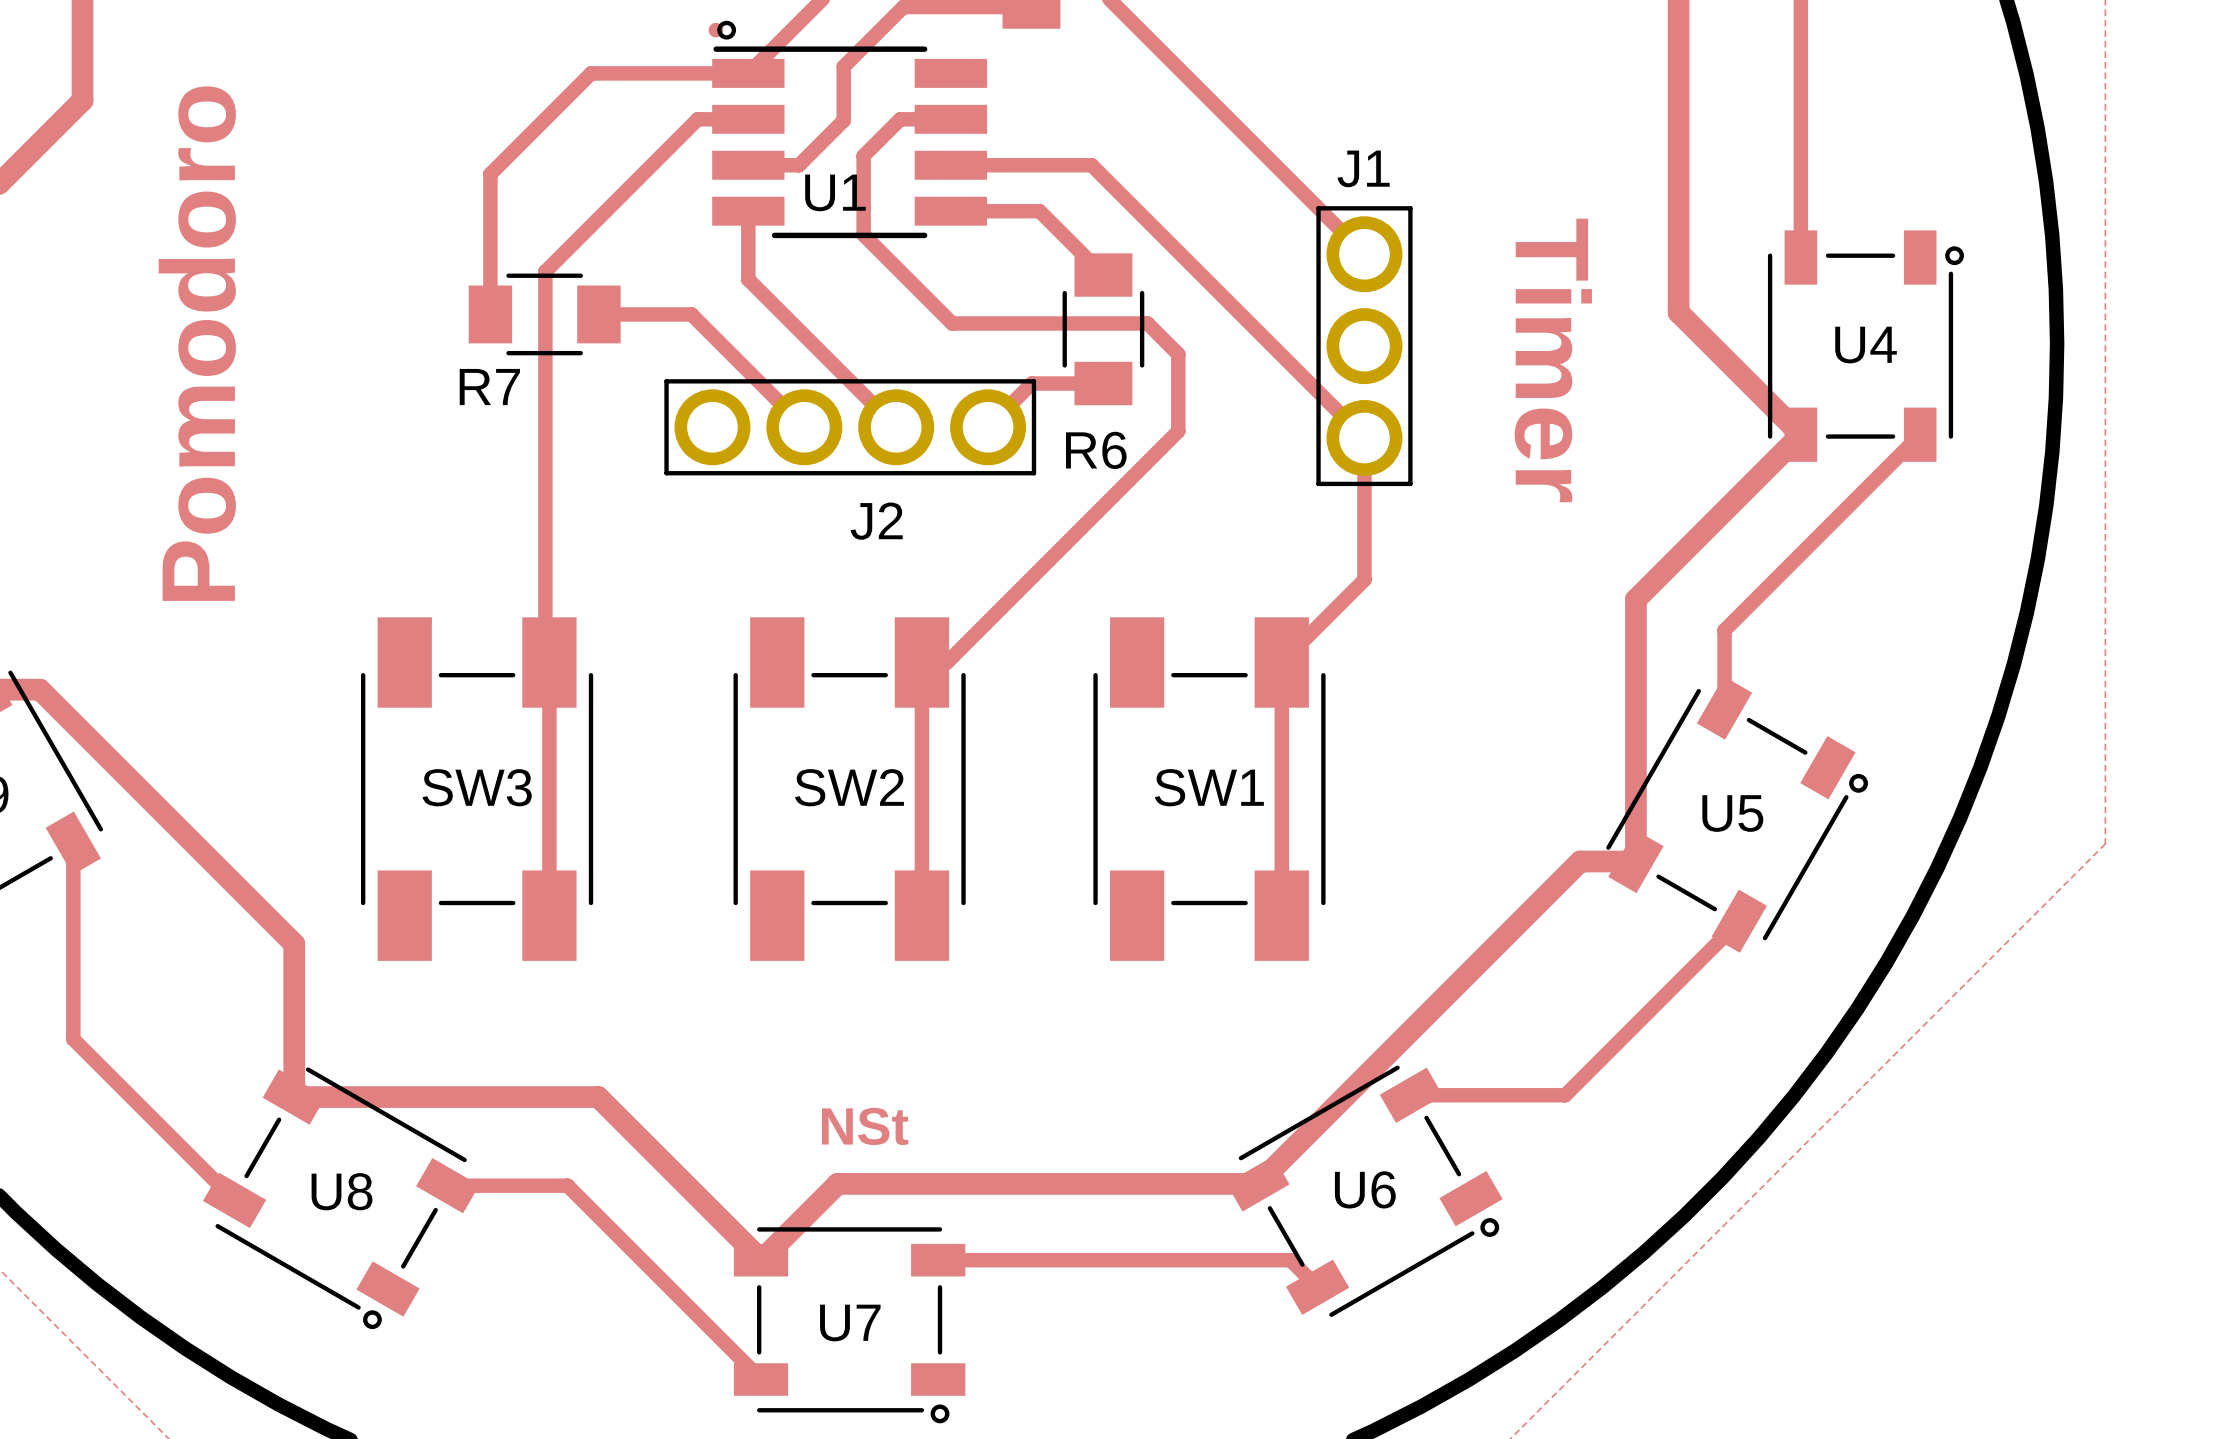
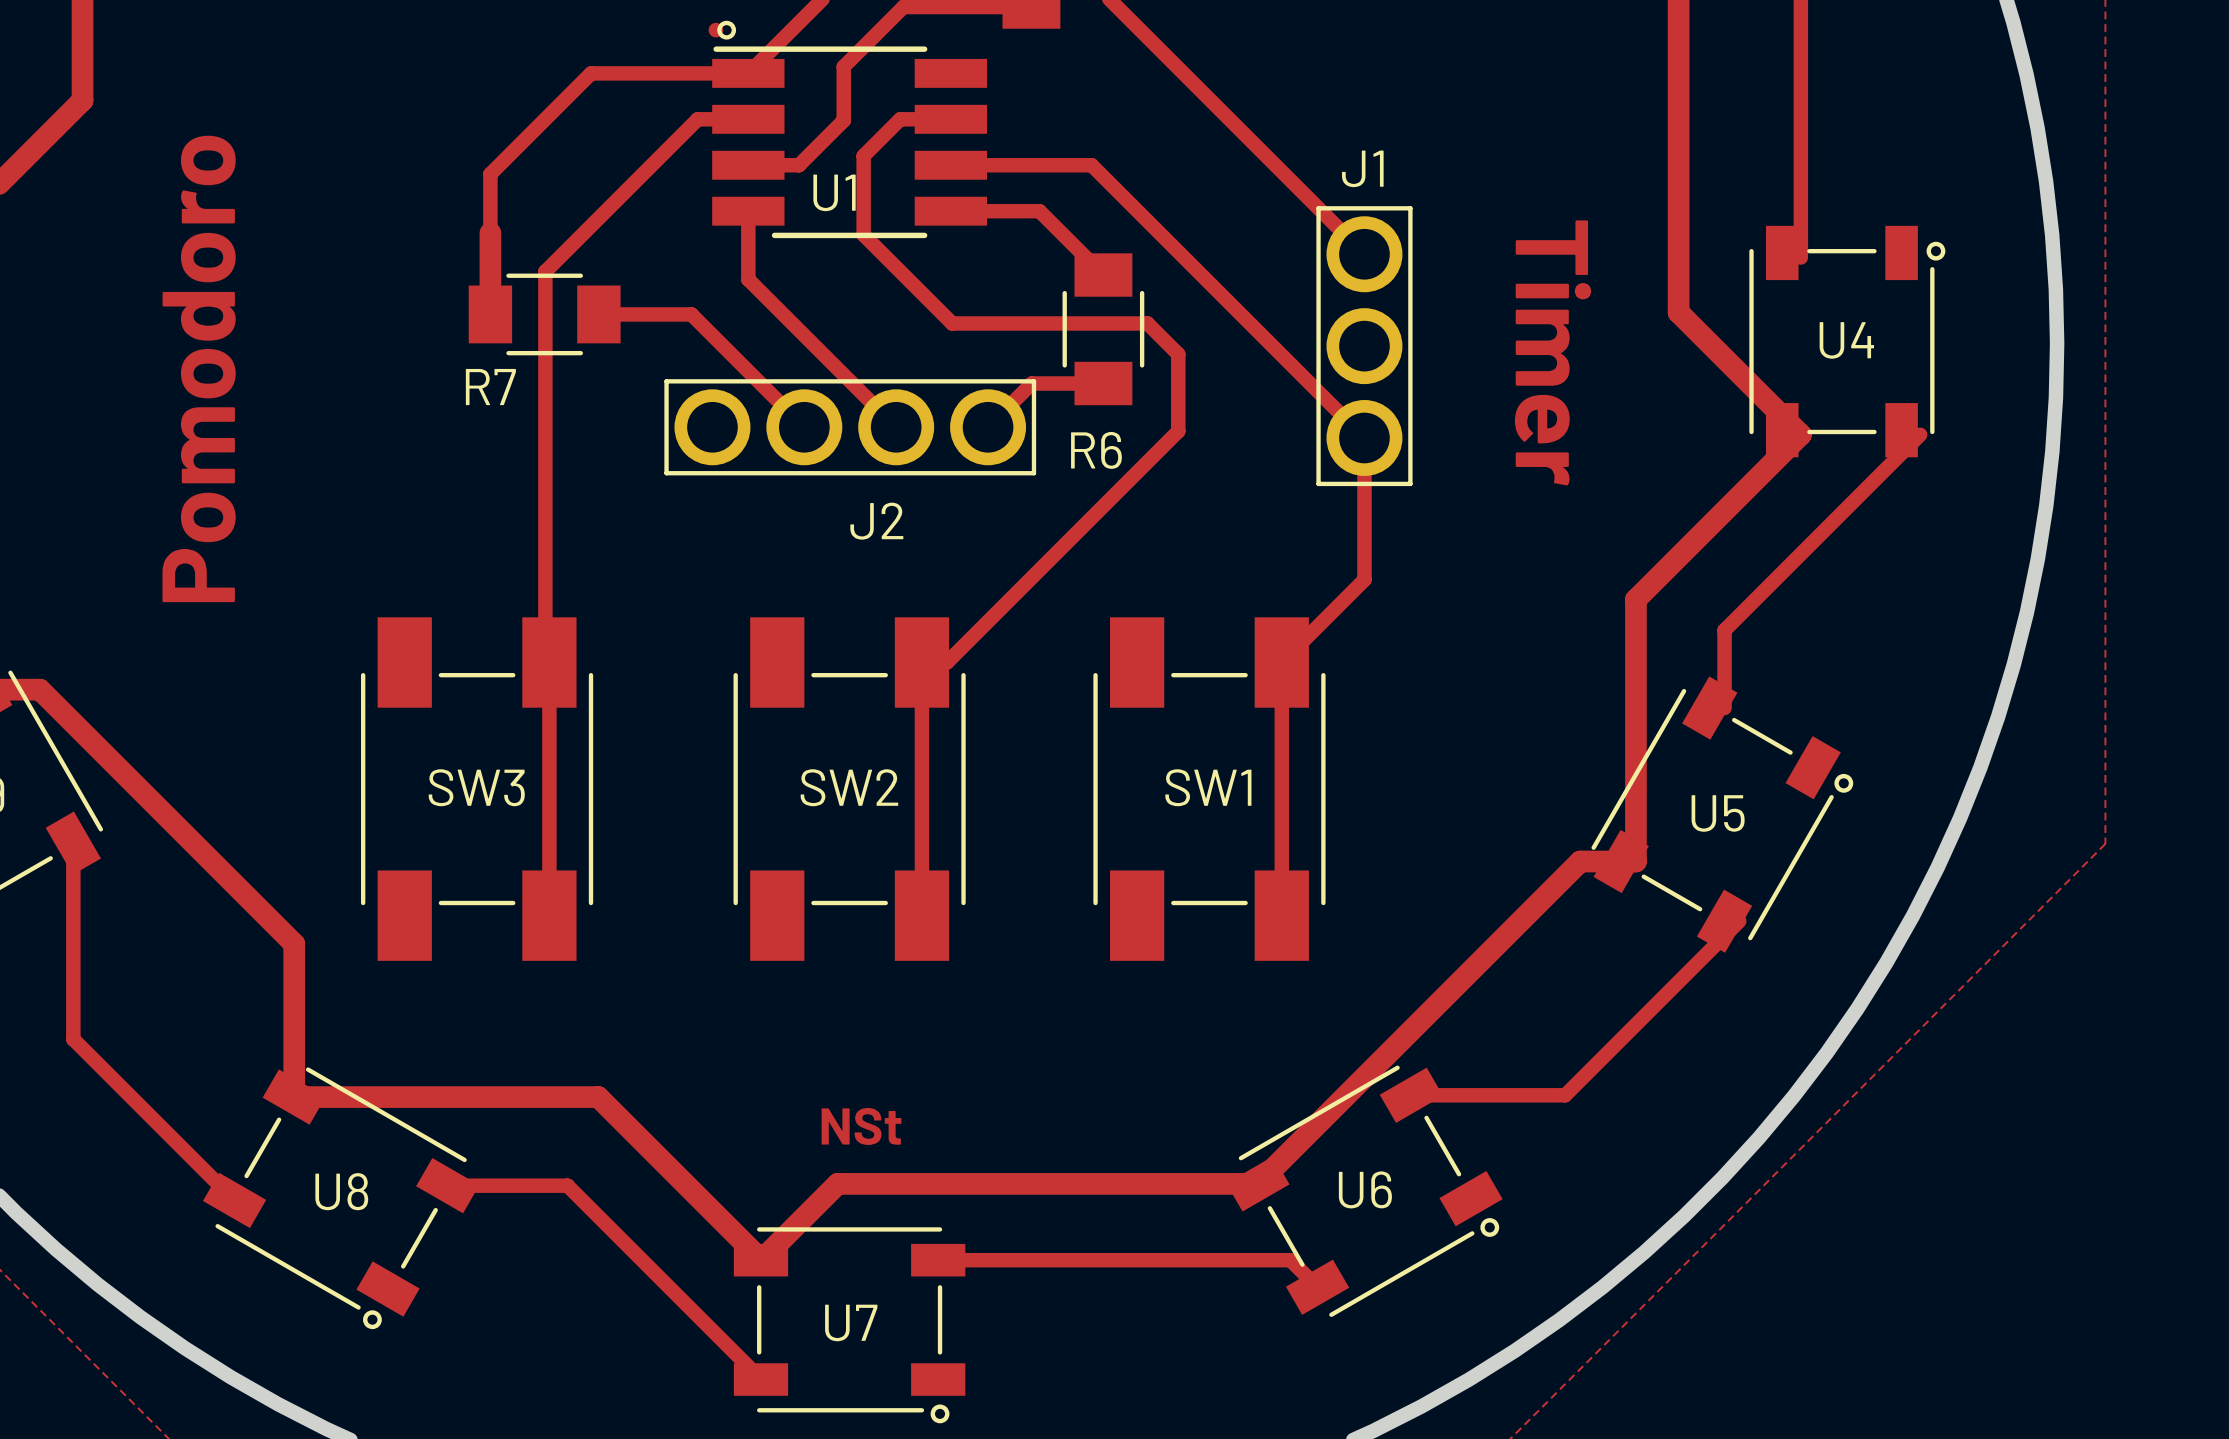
top track width: thin (490, 233) (490, 314) -> thick (490, 233) (490, 314)
U4 position: (1865, 346) -> (1847, 341)
U5 position: (1737, 814) -> (1722, 814)

